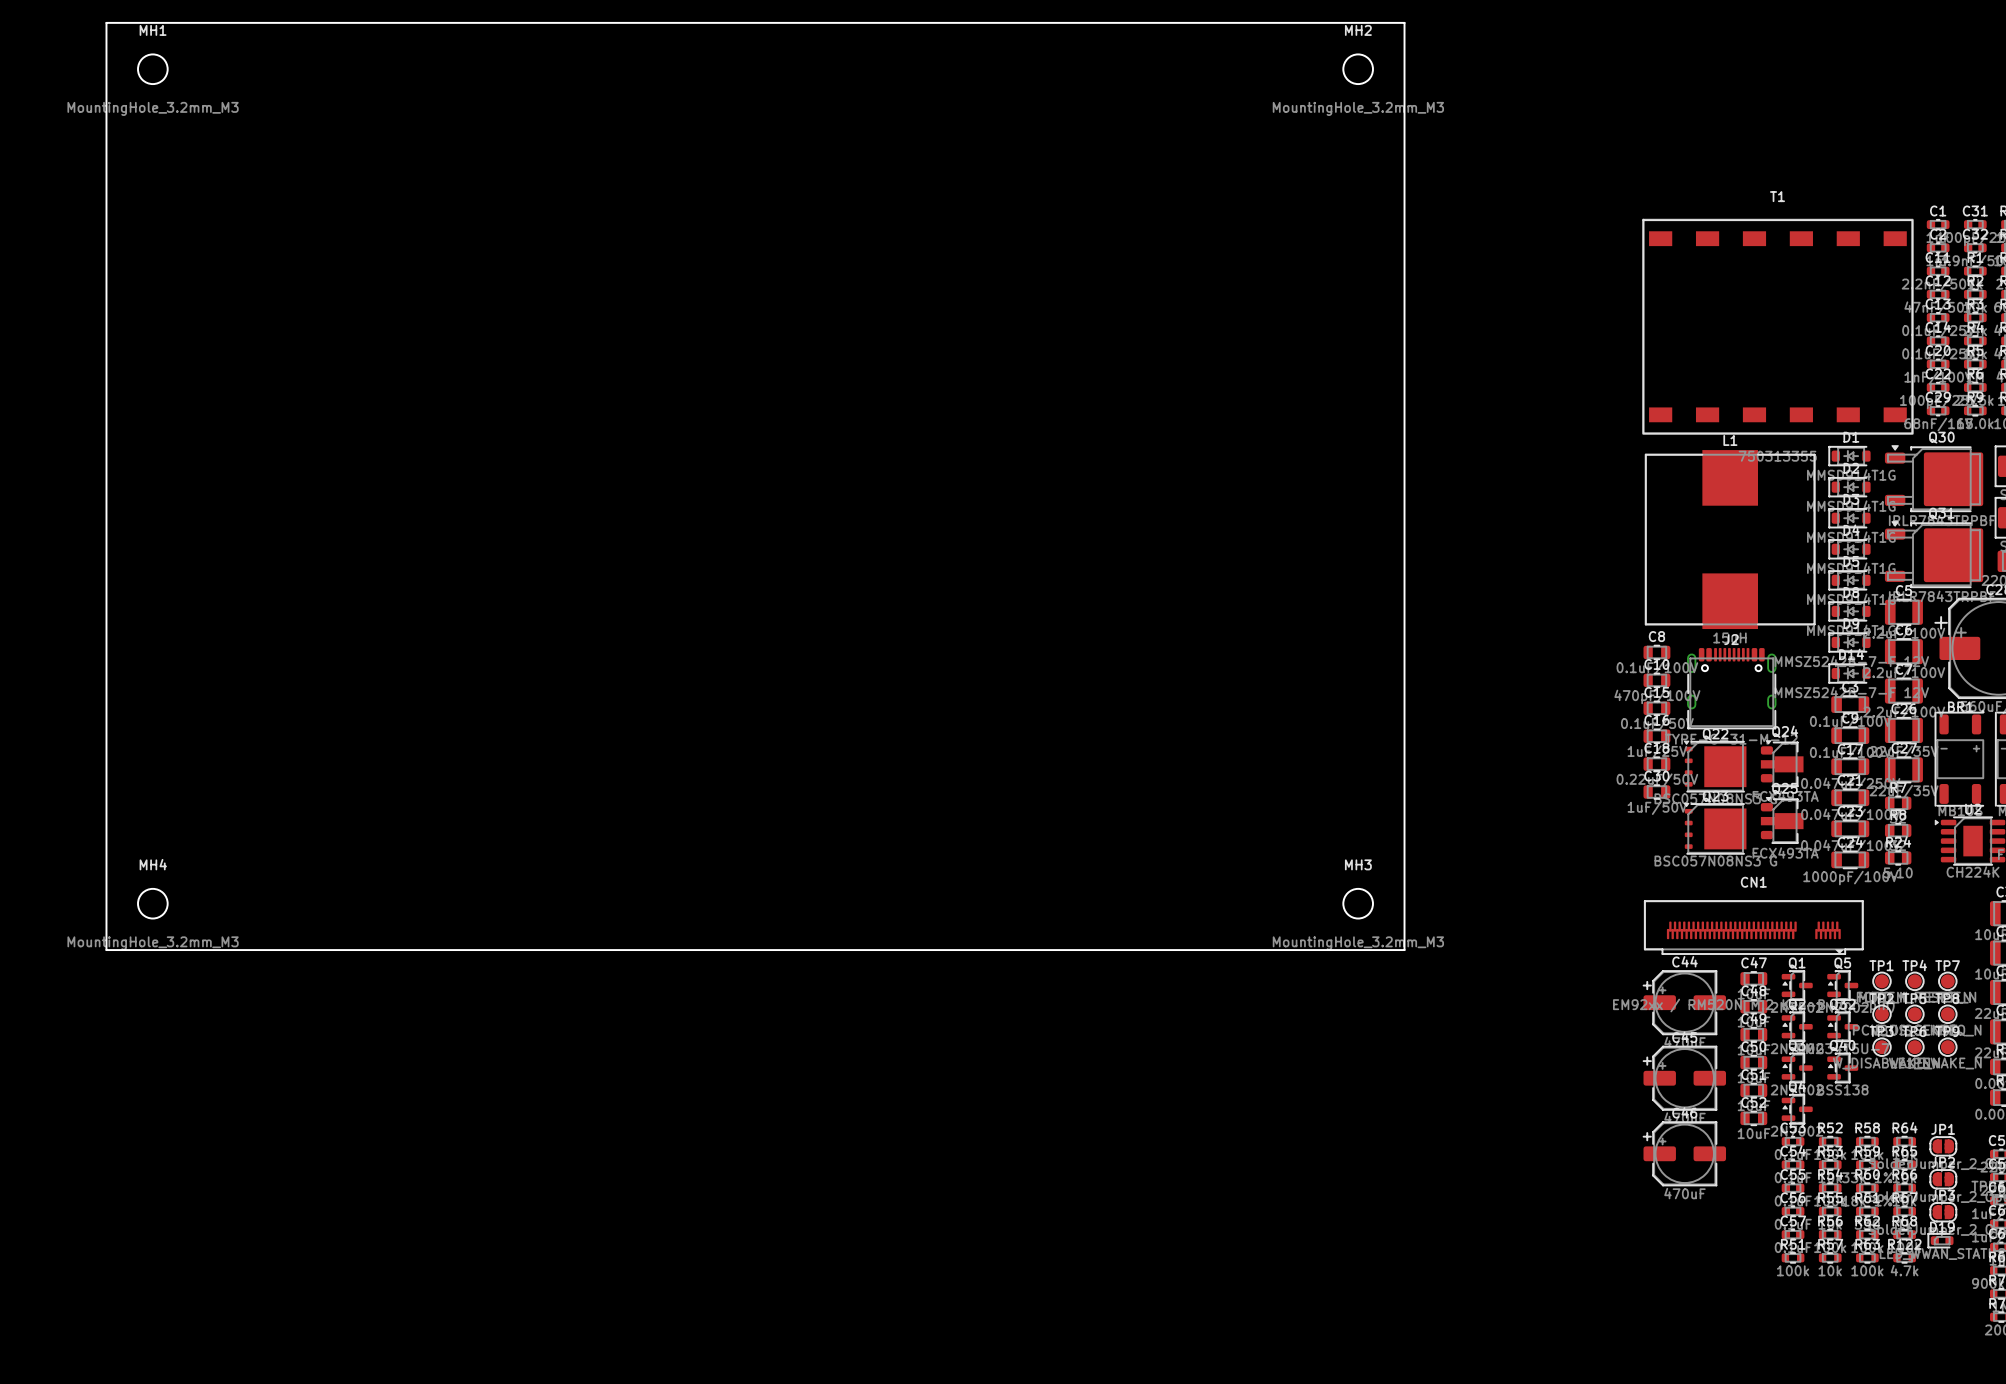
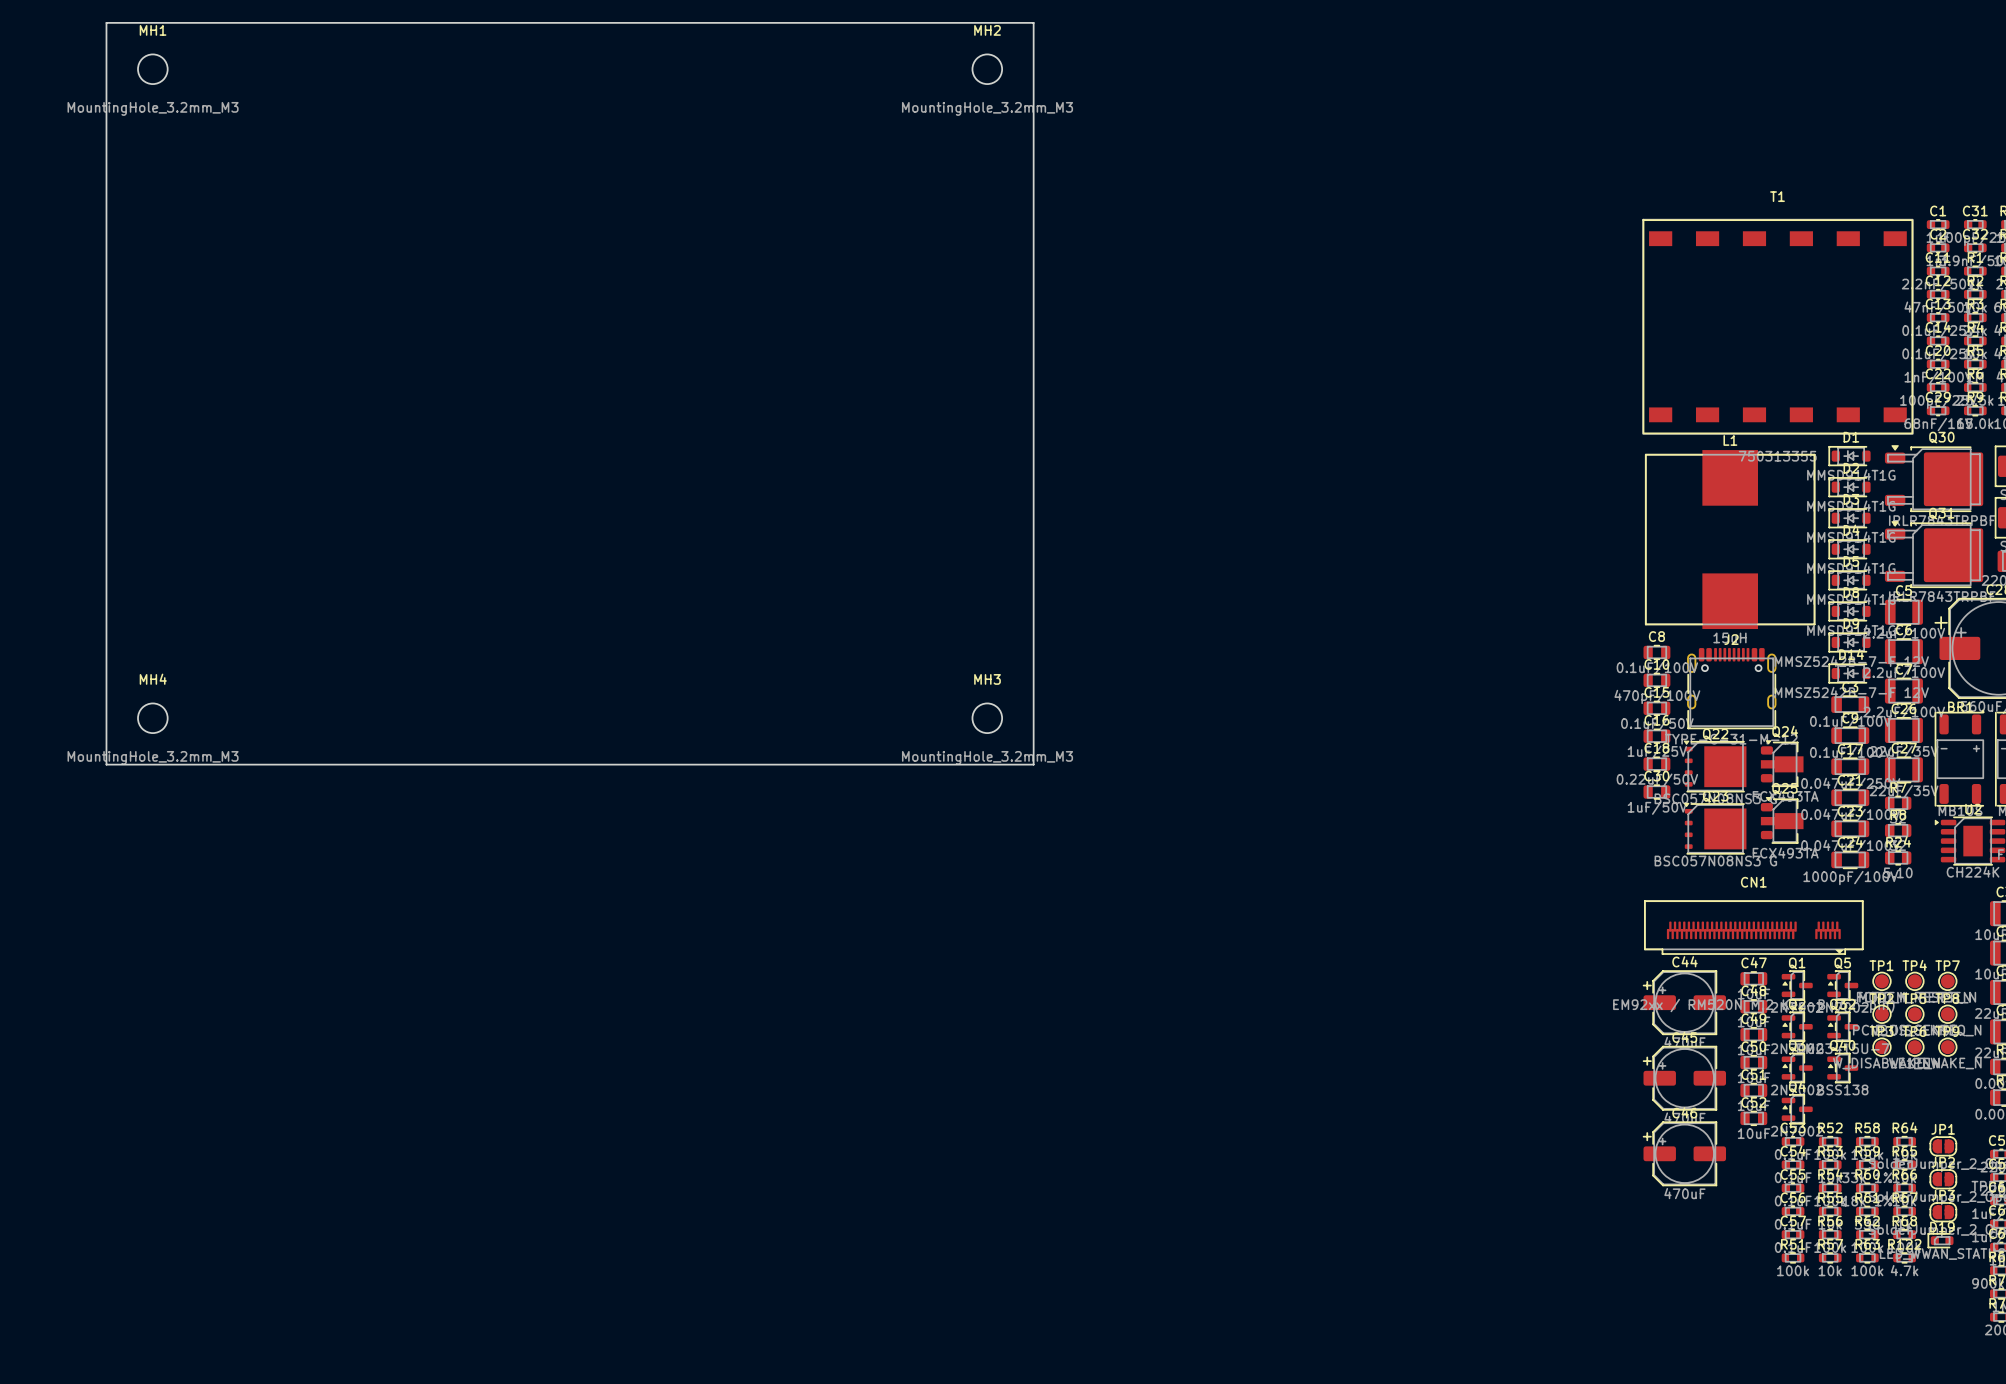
board edge: (1033, 22) (1404, 22) (1404, 950) (106, 950) (106, 764) -> (1033, 22) (1033, 764) (106, 764)
MH2 position: (1358, 69) -> (987, 69)
MH4 position: (152, 903) -> (152, 718)
MH3 position: (1358, 903) -> (987, 718)

